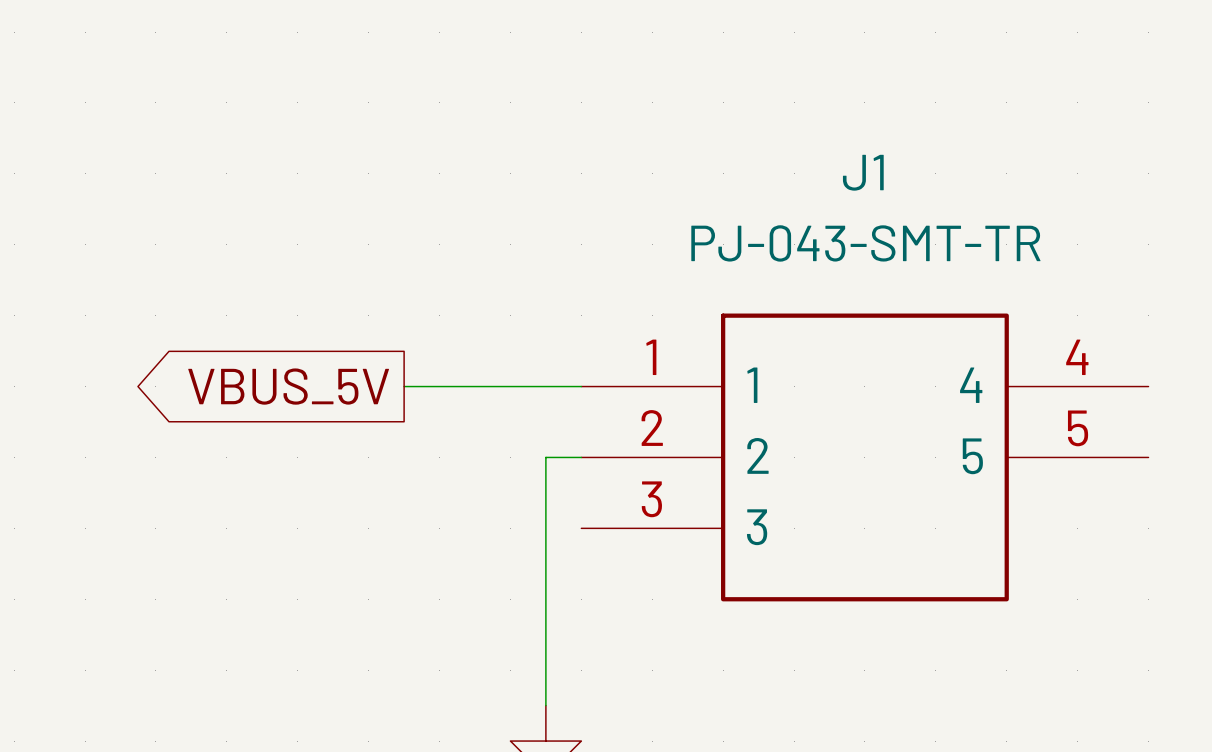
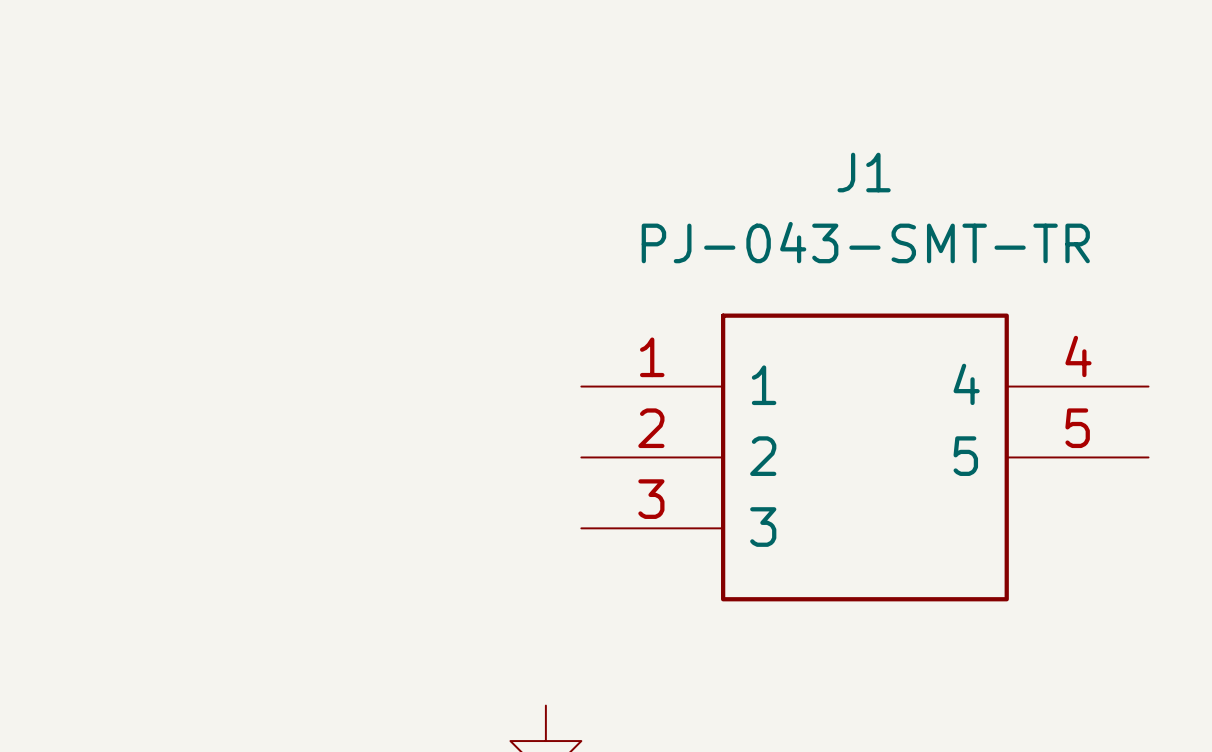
global label: VBUS_5V (288, 386) -> none
wire: (404, 386) (581, 386) -> none
wire: (581, 457) (545, 457) (545, 705) -> none

